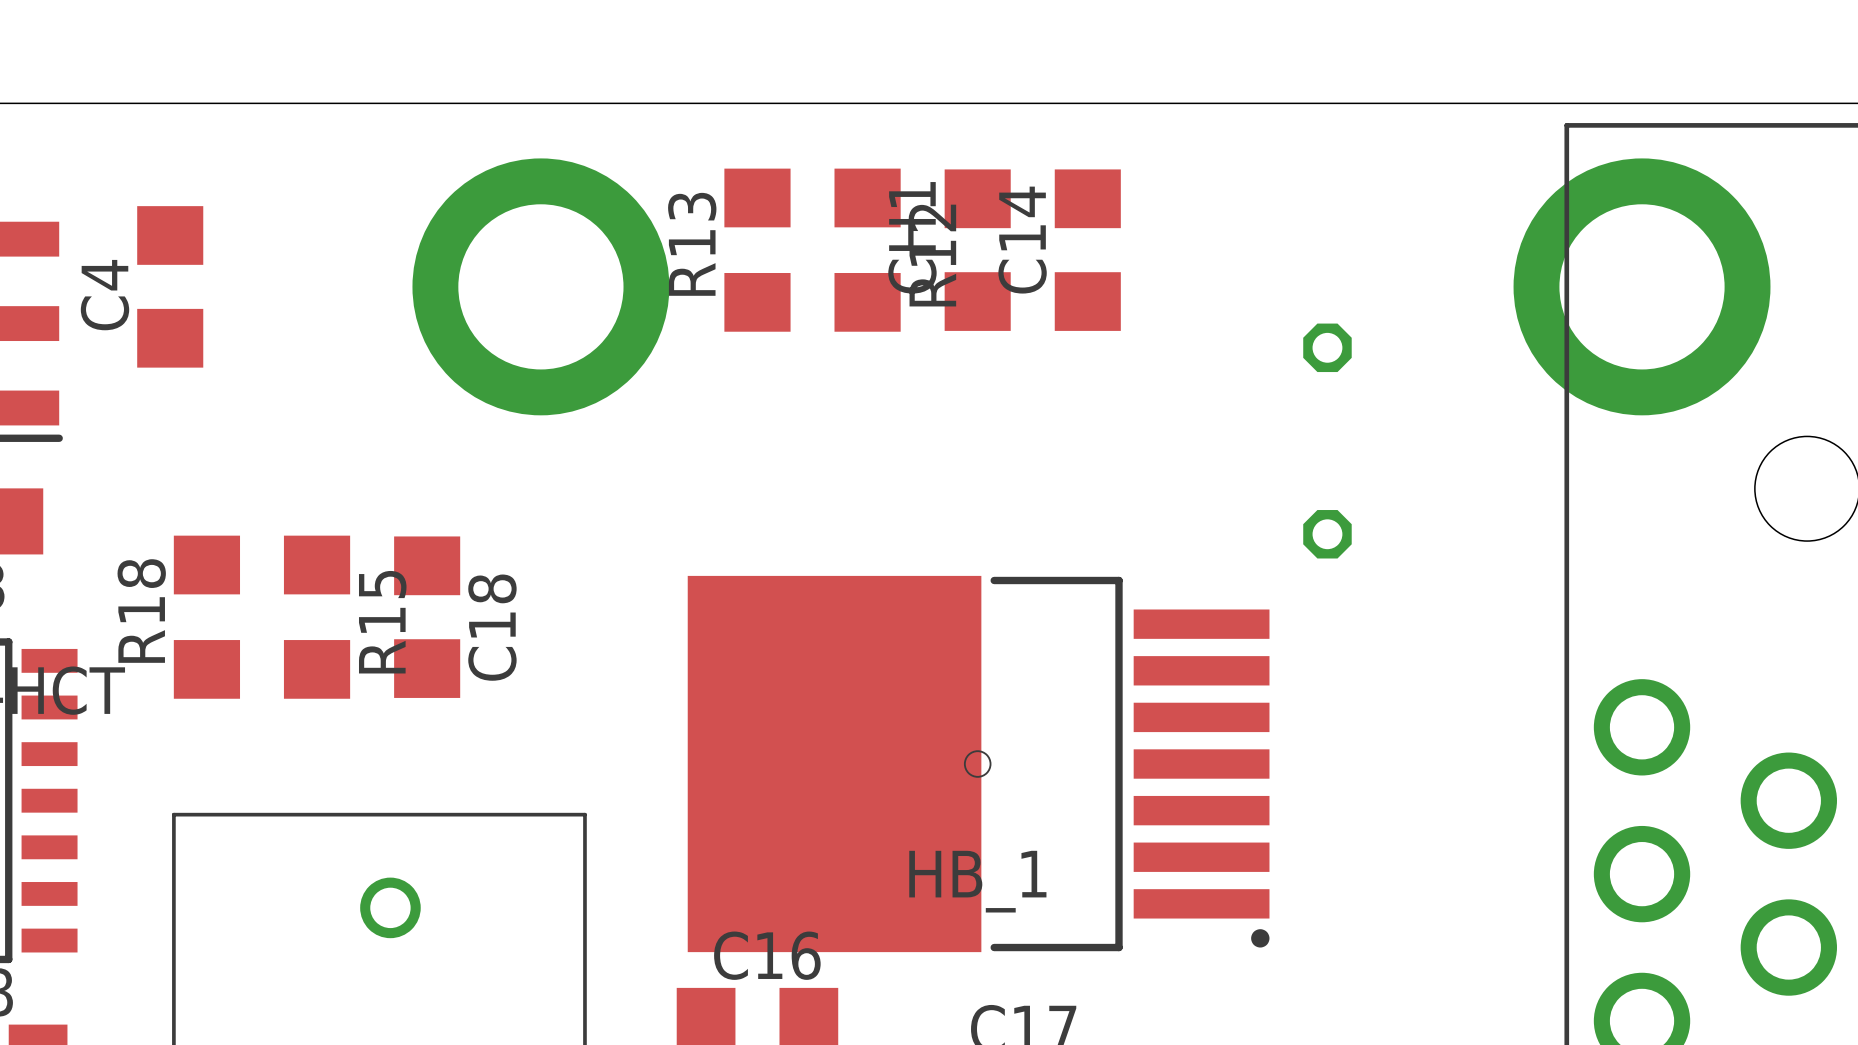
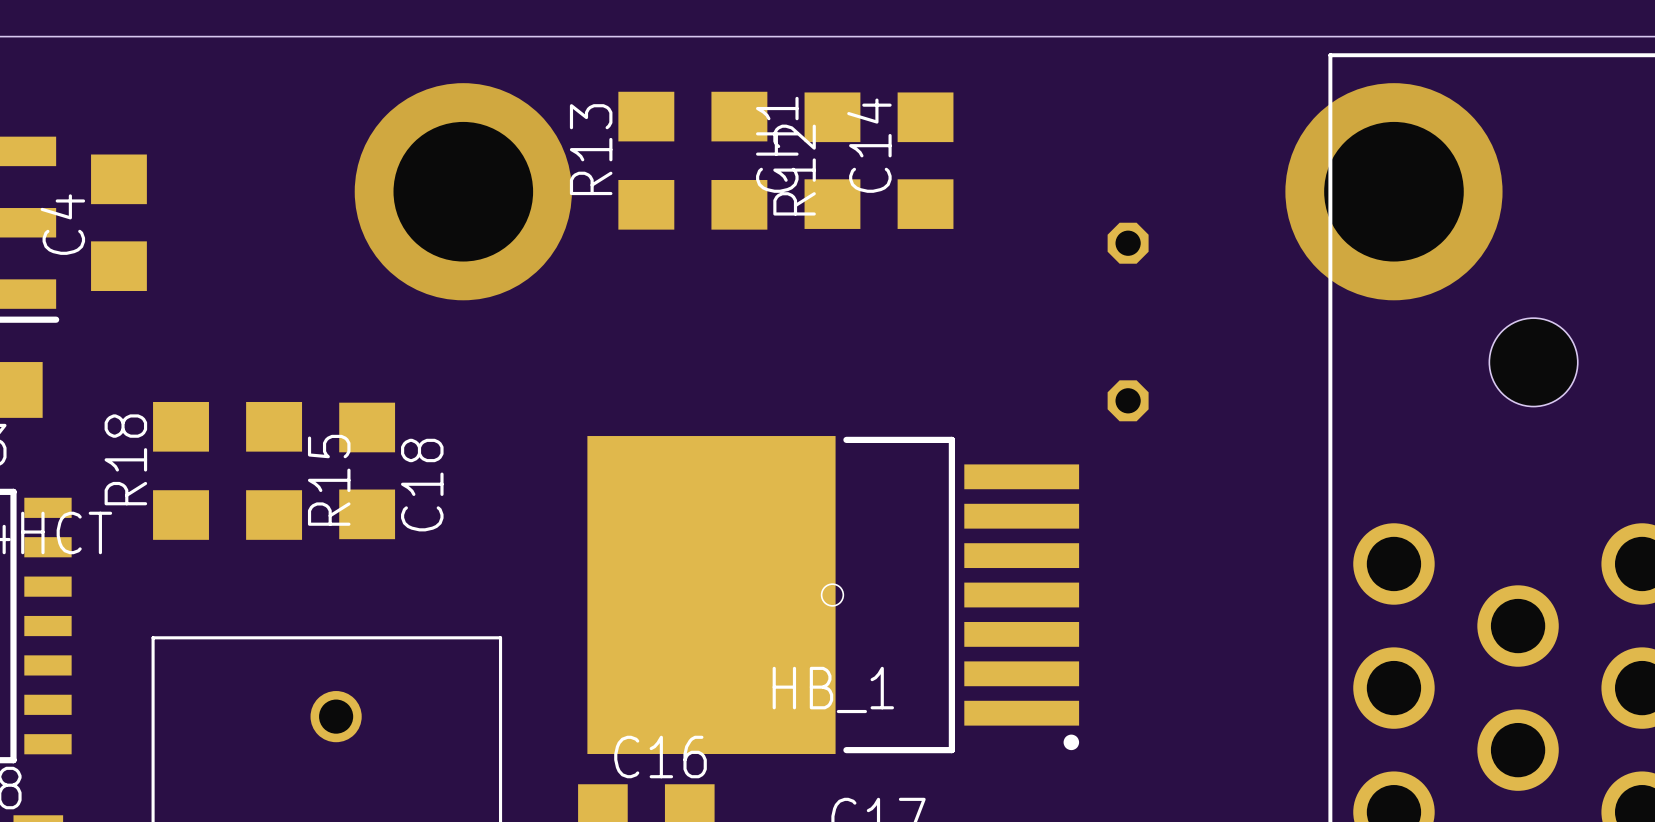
C4 position: (170, 286) -> (118, 222)

